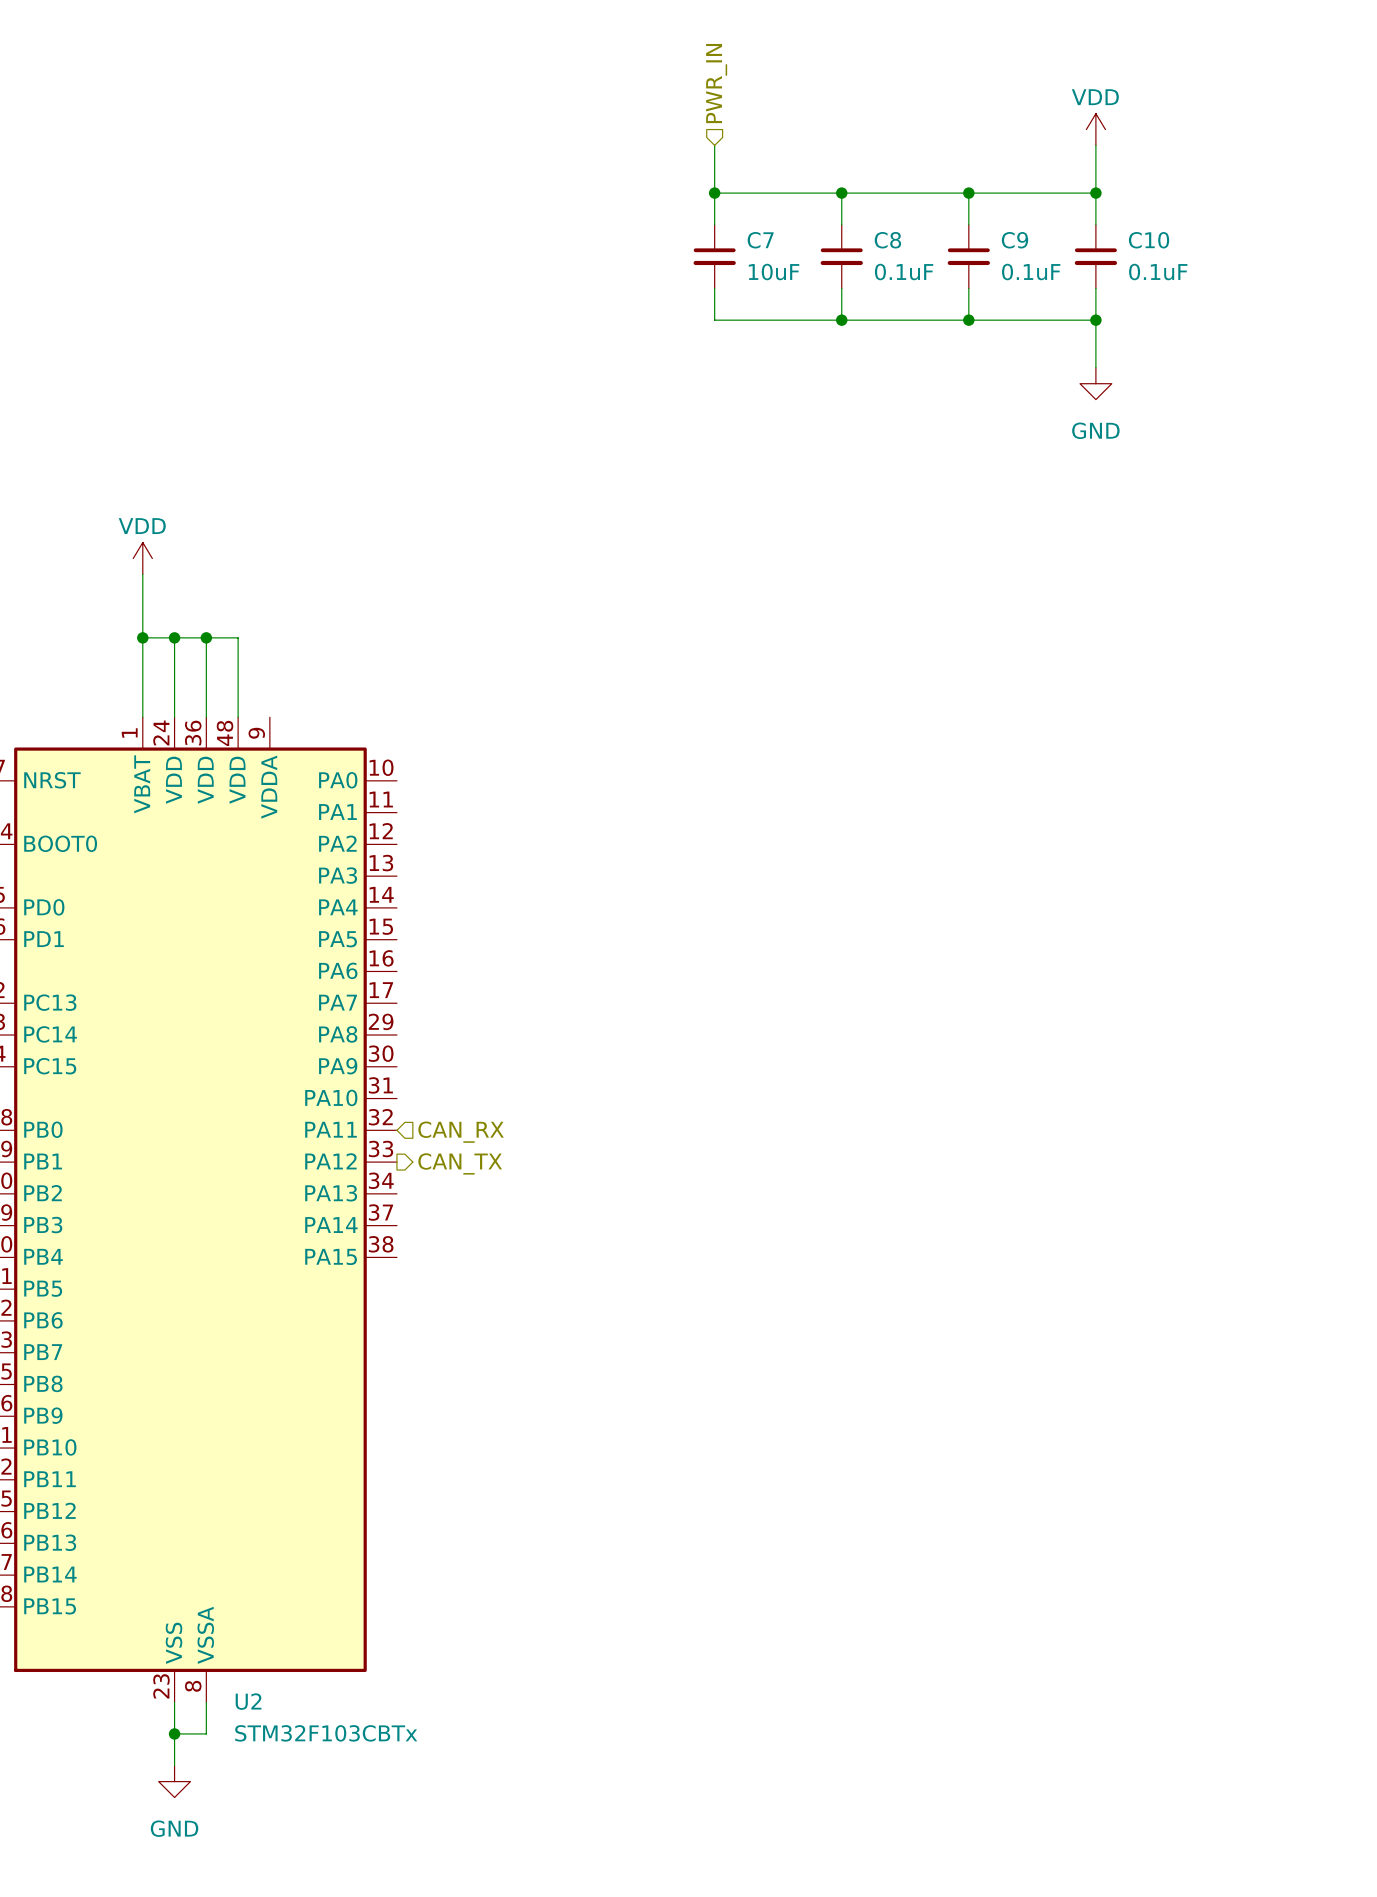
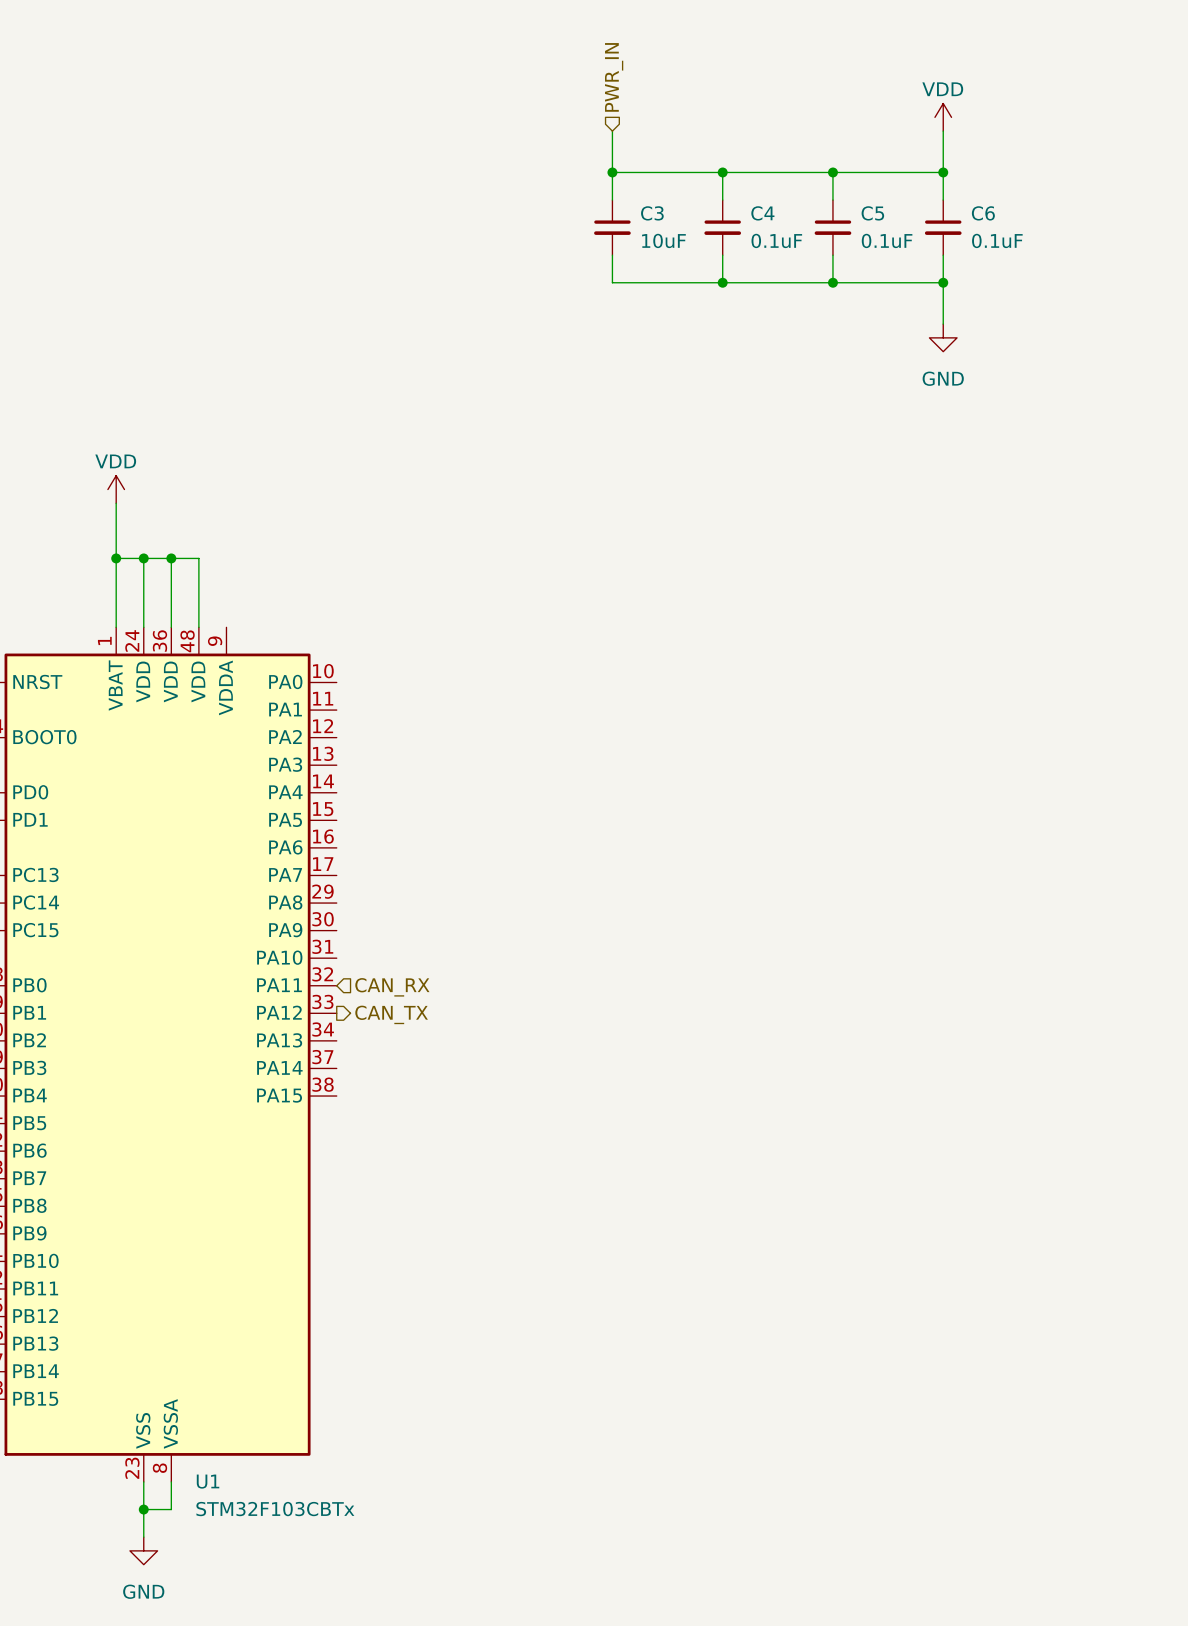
C7 name: C7 (760, 240) -> C3 (652, 213)
C8 name: C8 (887, 240) -> C4 (762, 213)
C9 name: C9 (1014, 240) -> C5 (872, 213)
C10 name: C10 (1149, 240) -> C6 (983, 213)
U2 name: U2 (248, 1701) -> U1 (208, 1481)

